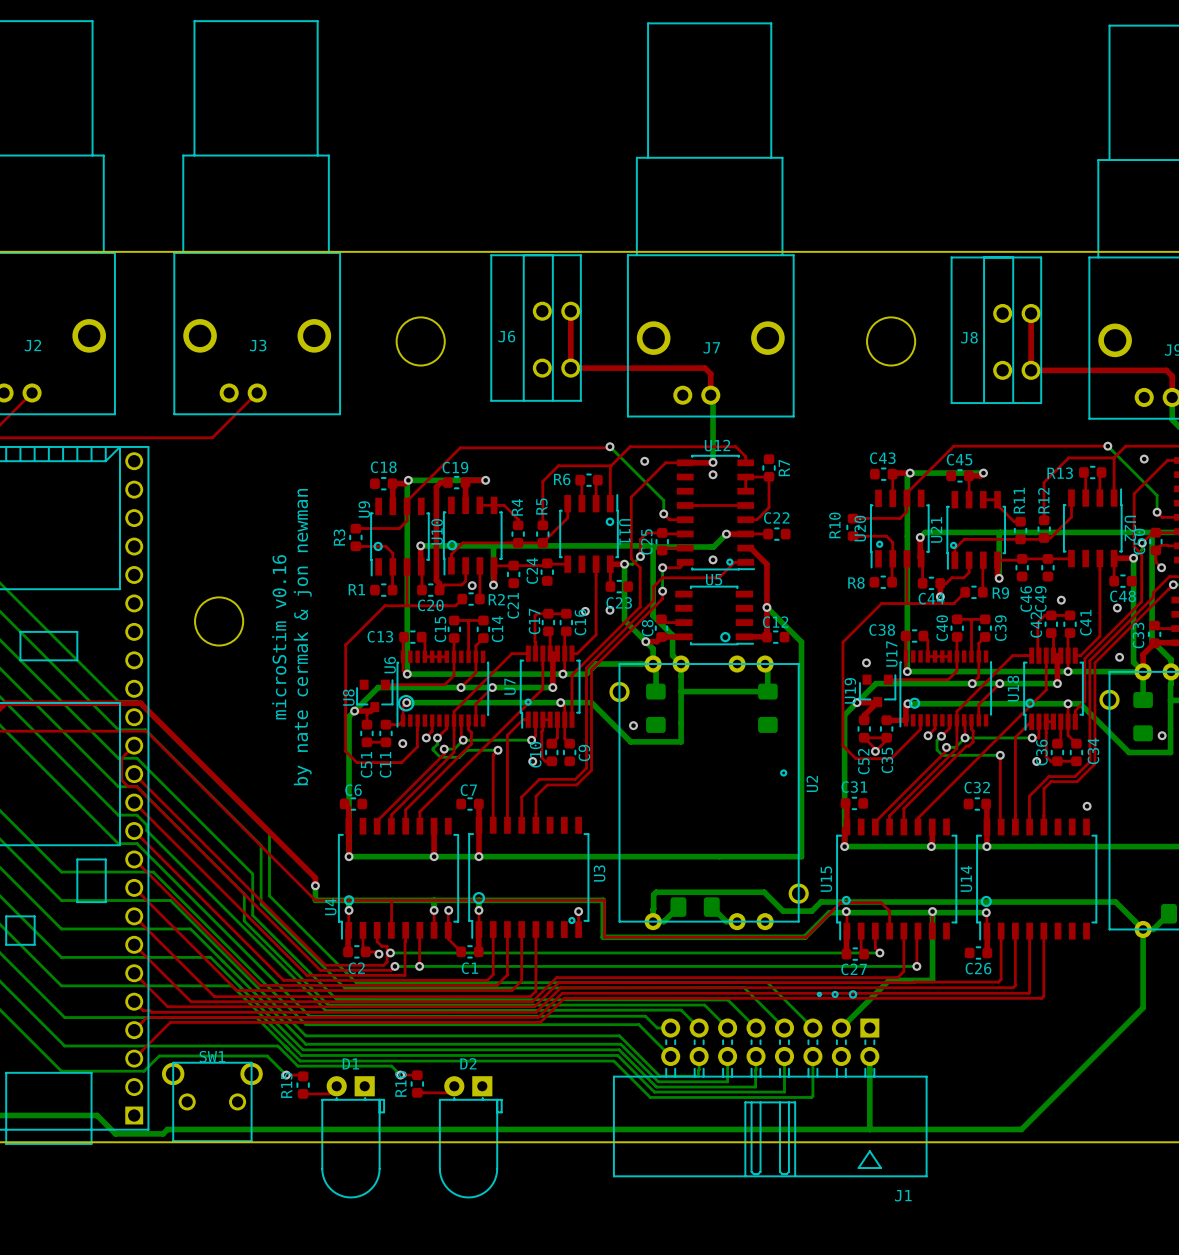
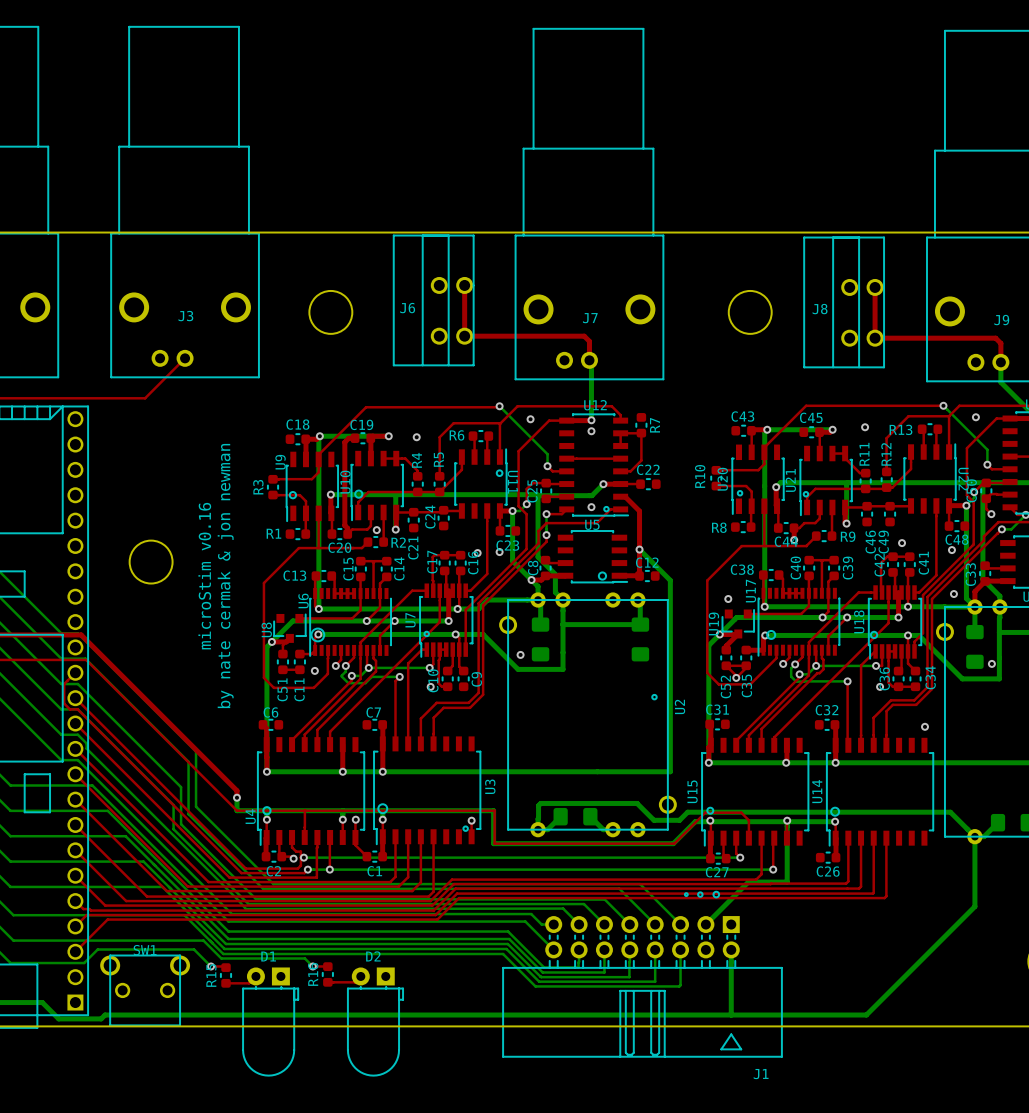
via: none -> (865, 427)
via: none -> (416, 437)

